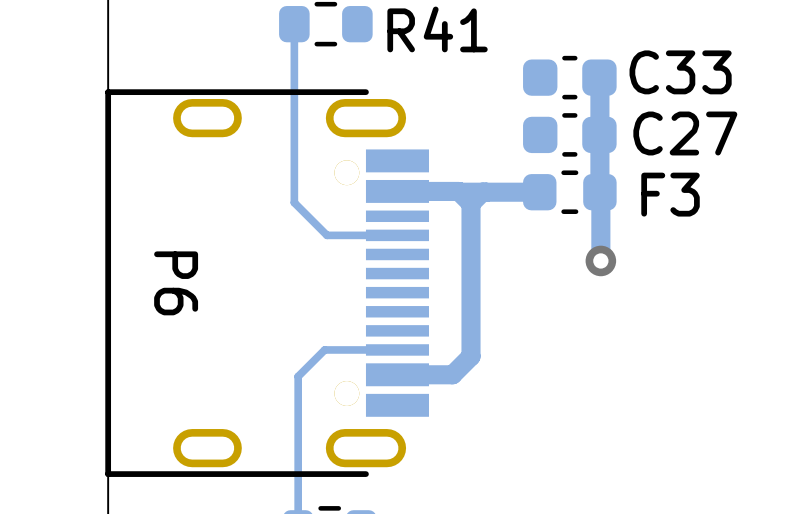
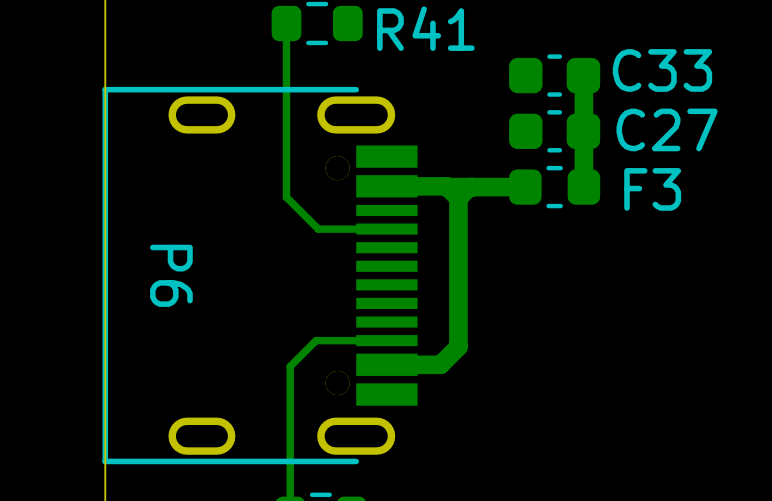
track: (599, 192) (600, 253) -> none
via: (600, 260) -> none

